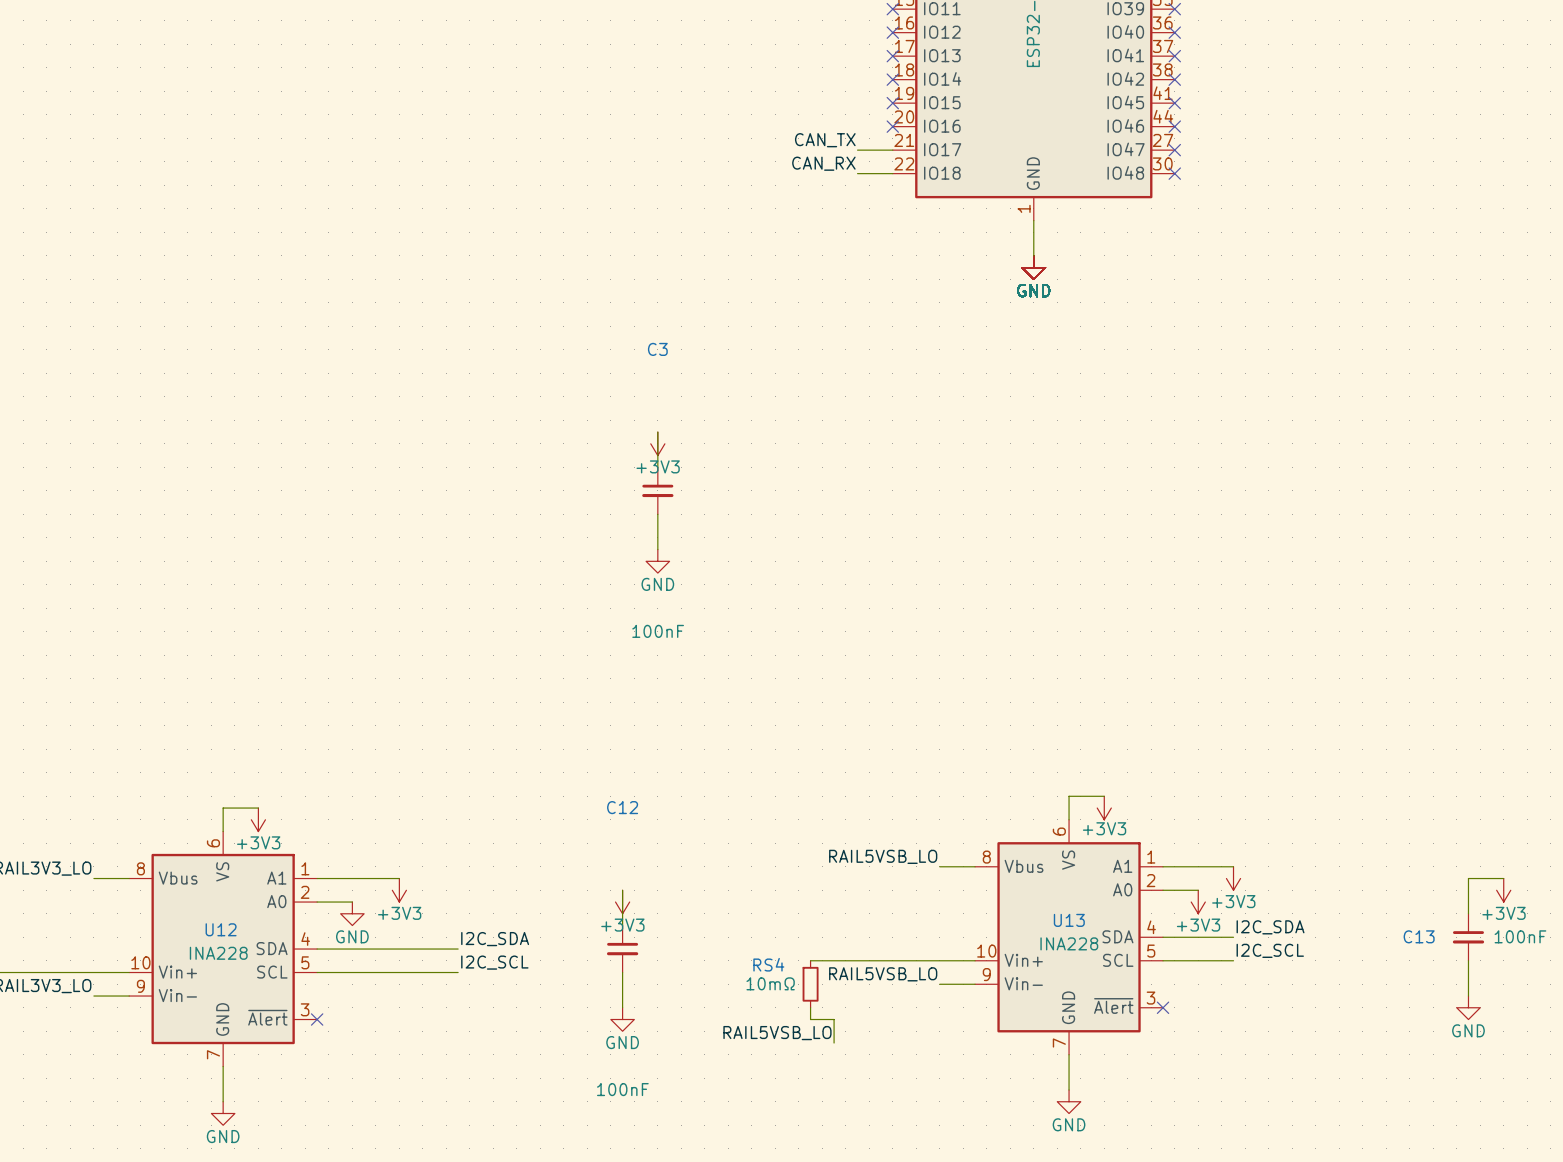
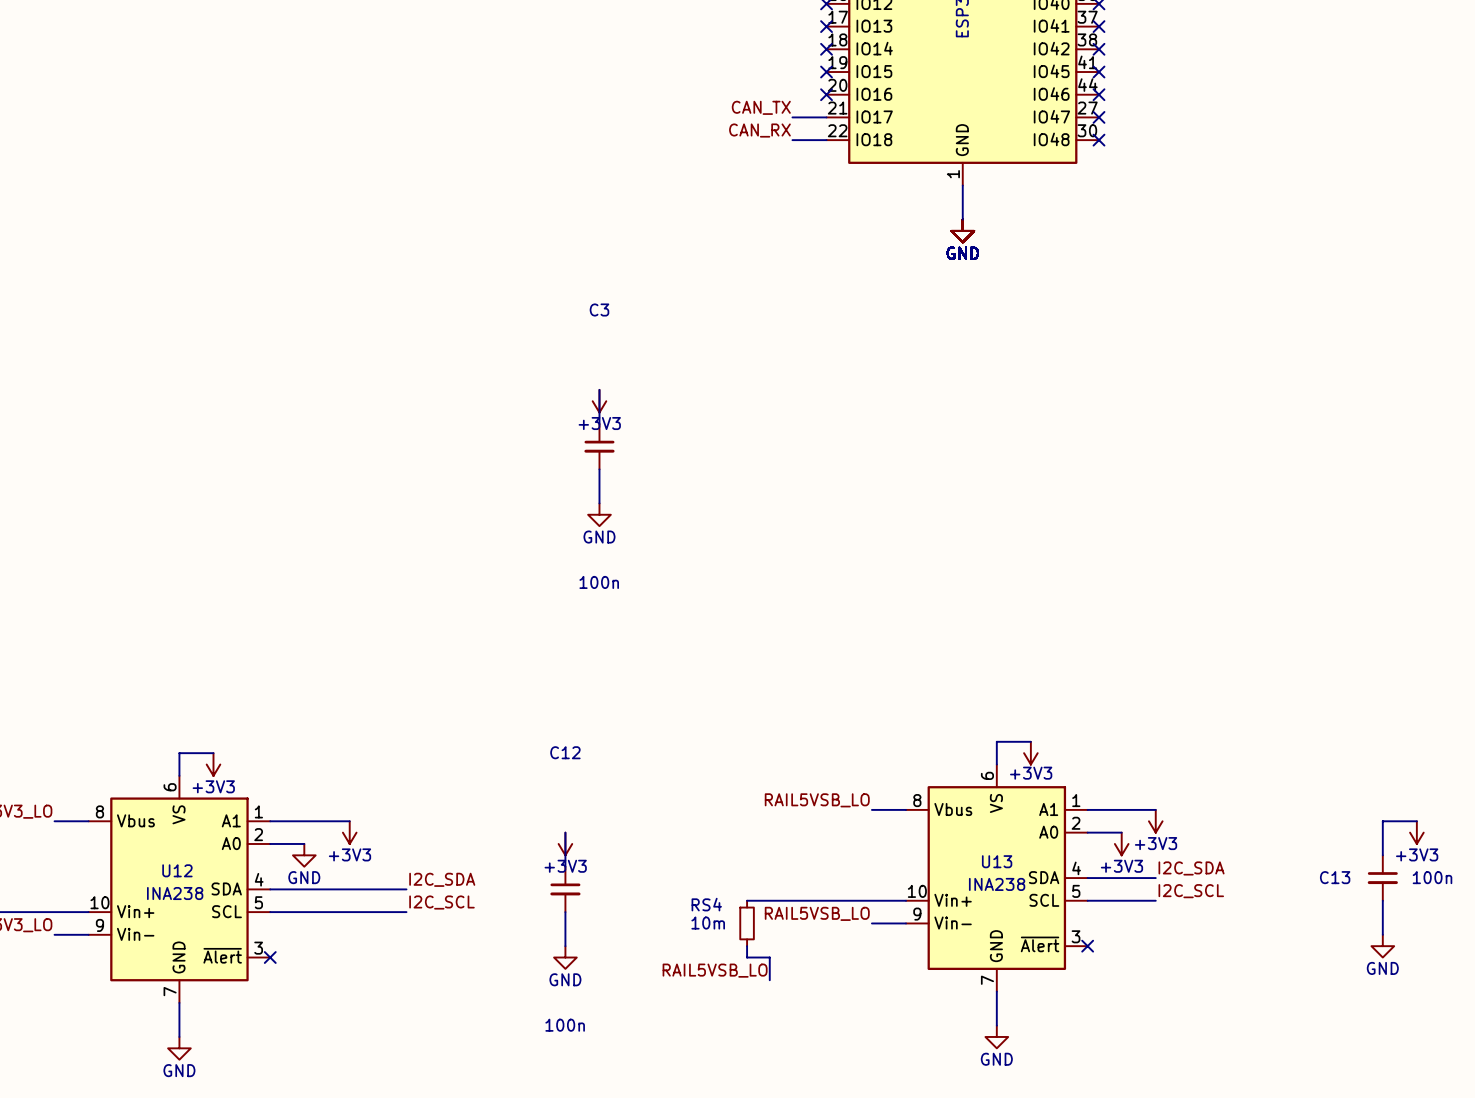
C3 value: 100nF (658, 631) -> 100n (599, 582)
C13 value: 100nF (1520, 936) -> 100n (1432, 877)
U13 value: INA228 (1069, 943) -> INA238 (997, 884)
U12 value: INA228 (218, 953) -> INA238 (175, 893)
RS4 value: 10mΩ (770, 983) -> 10m (708, 923)
C12 value: 100nF (622, 1089) -> 100n (565, 1025)

